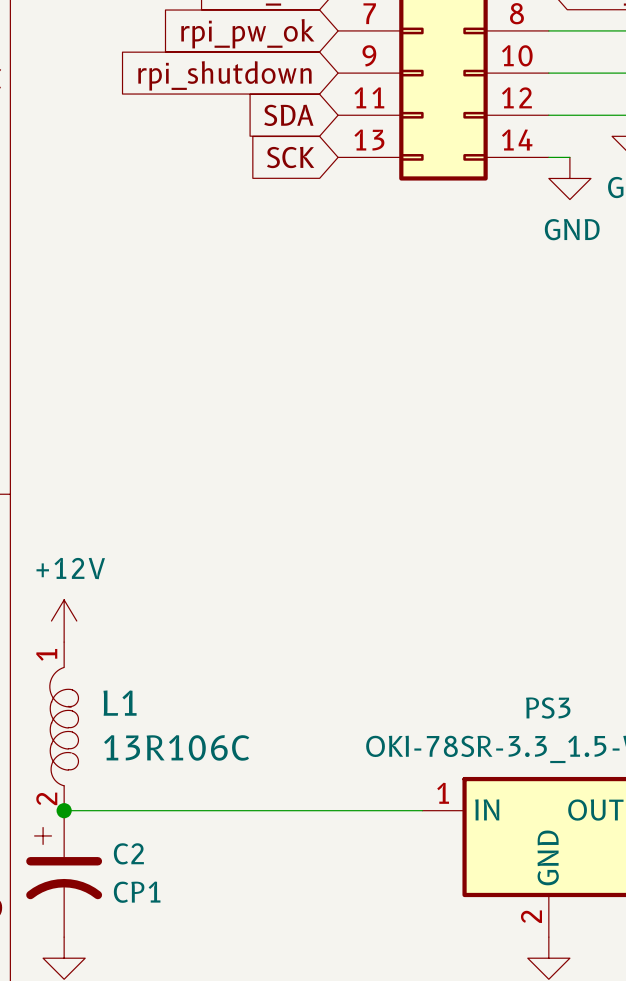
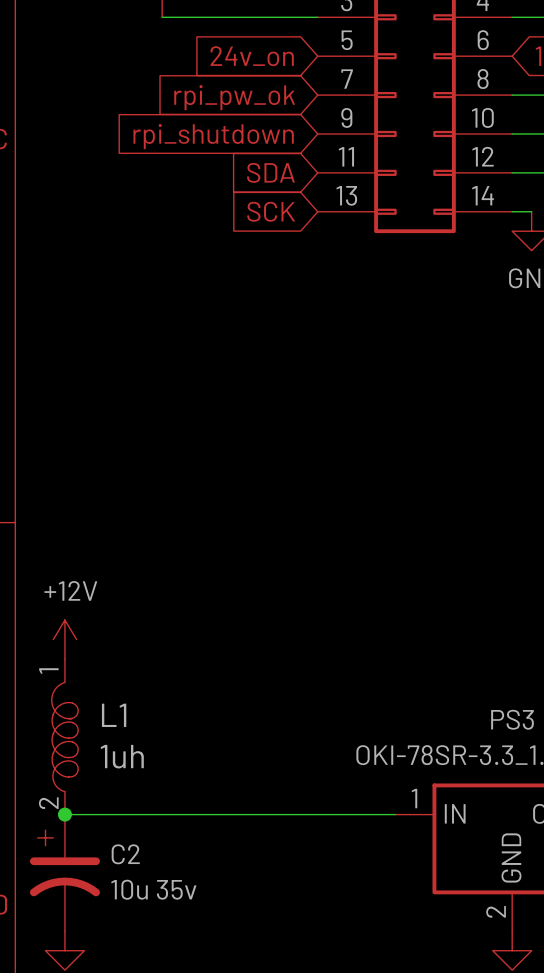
L1 value: 13R106C (176, 747) -> 1uh (122, 756)
C2 value: CP1 (137, 892) -> 10u 35v (153, 889)

